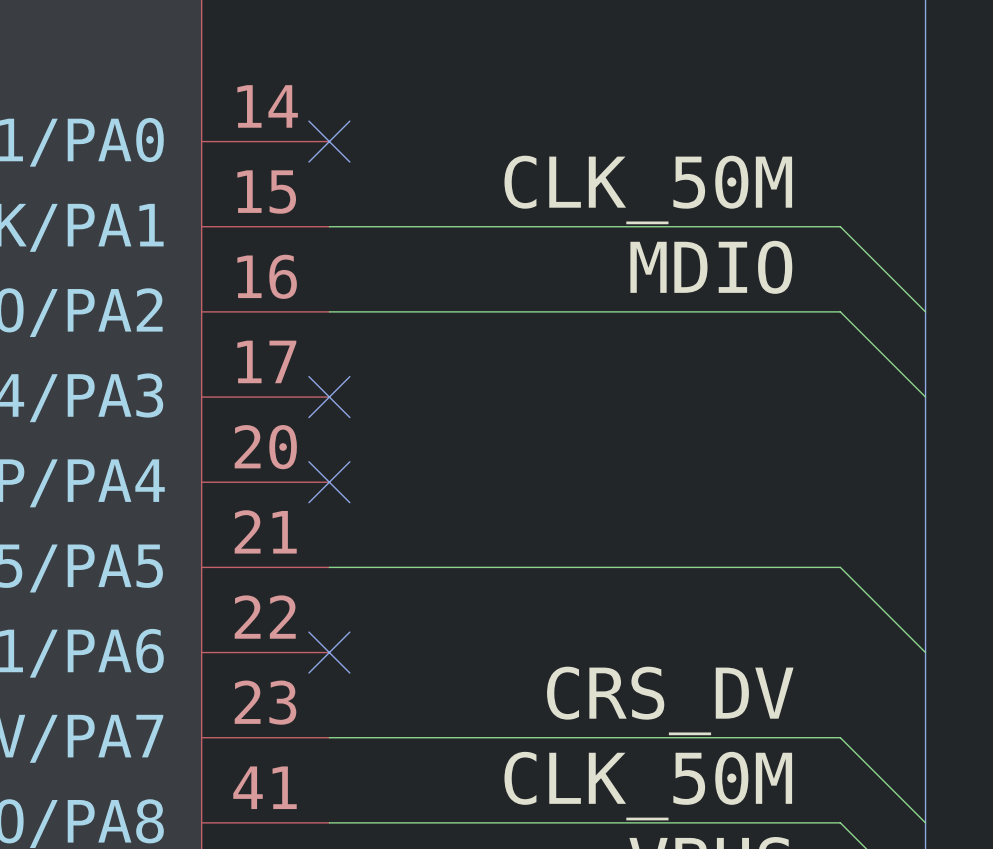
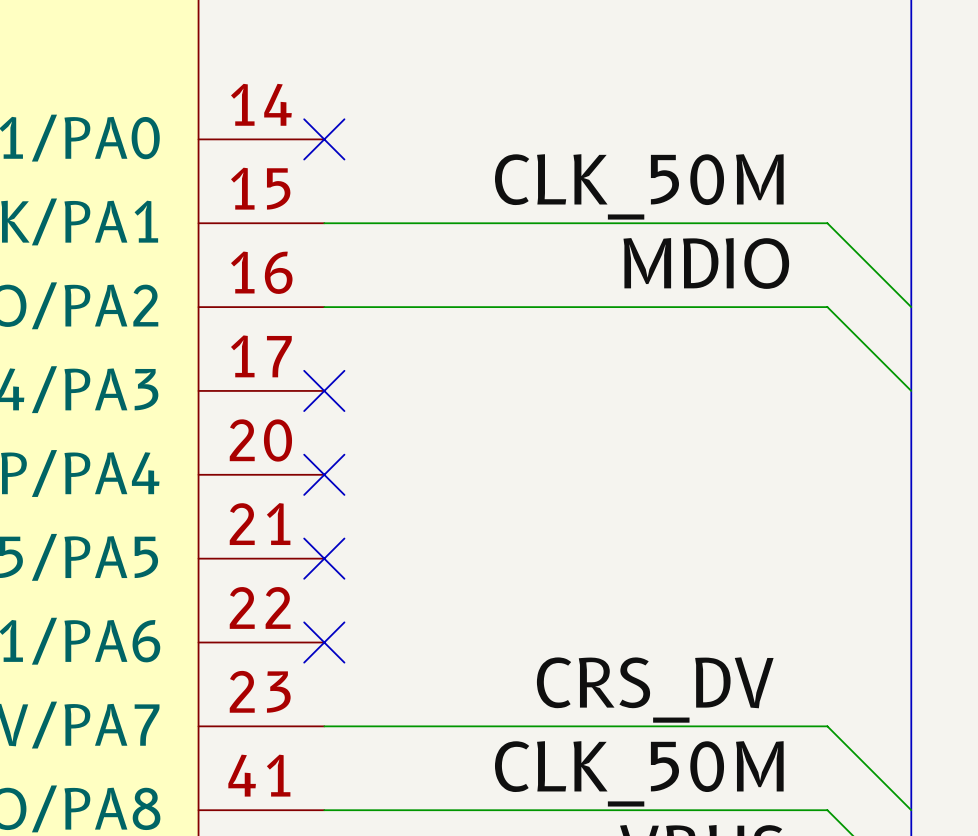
wire: (329, 567) (840, 567) (925, 652) -> none
no-connect mark: none -> (324, 558)

